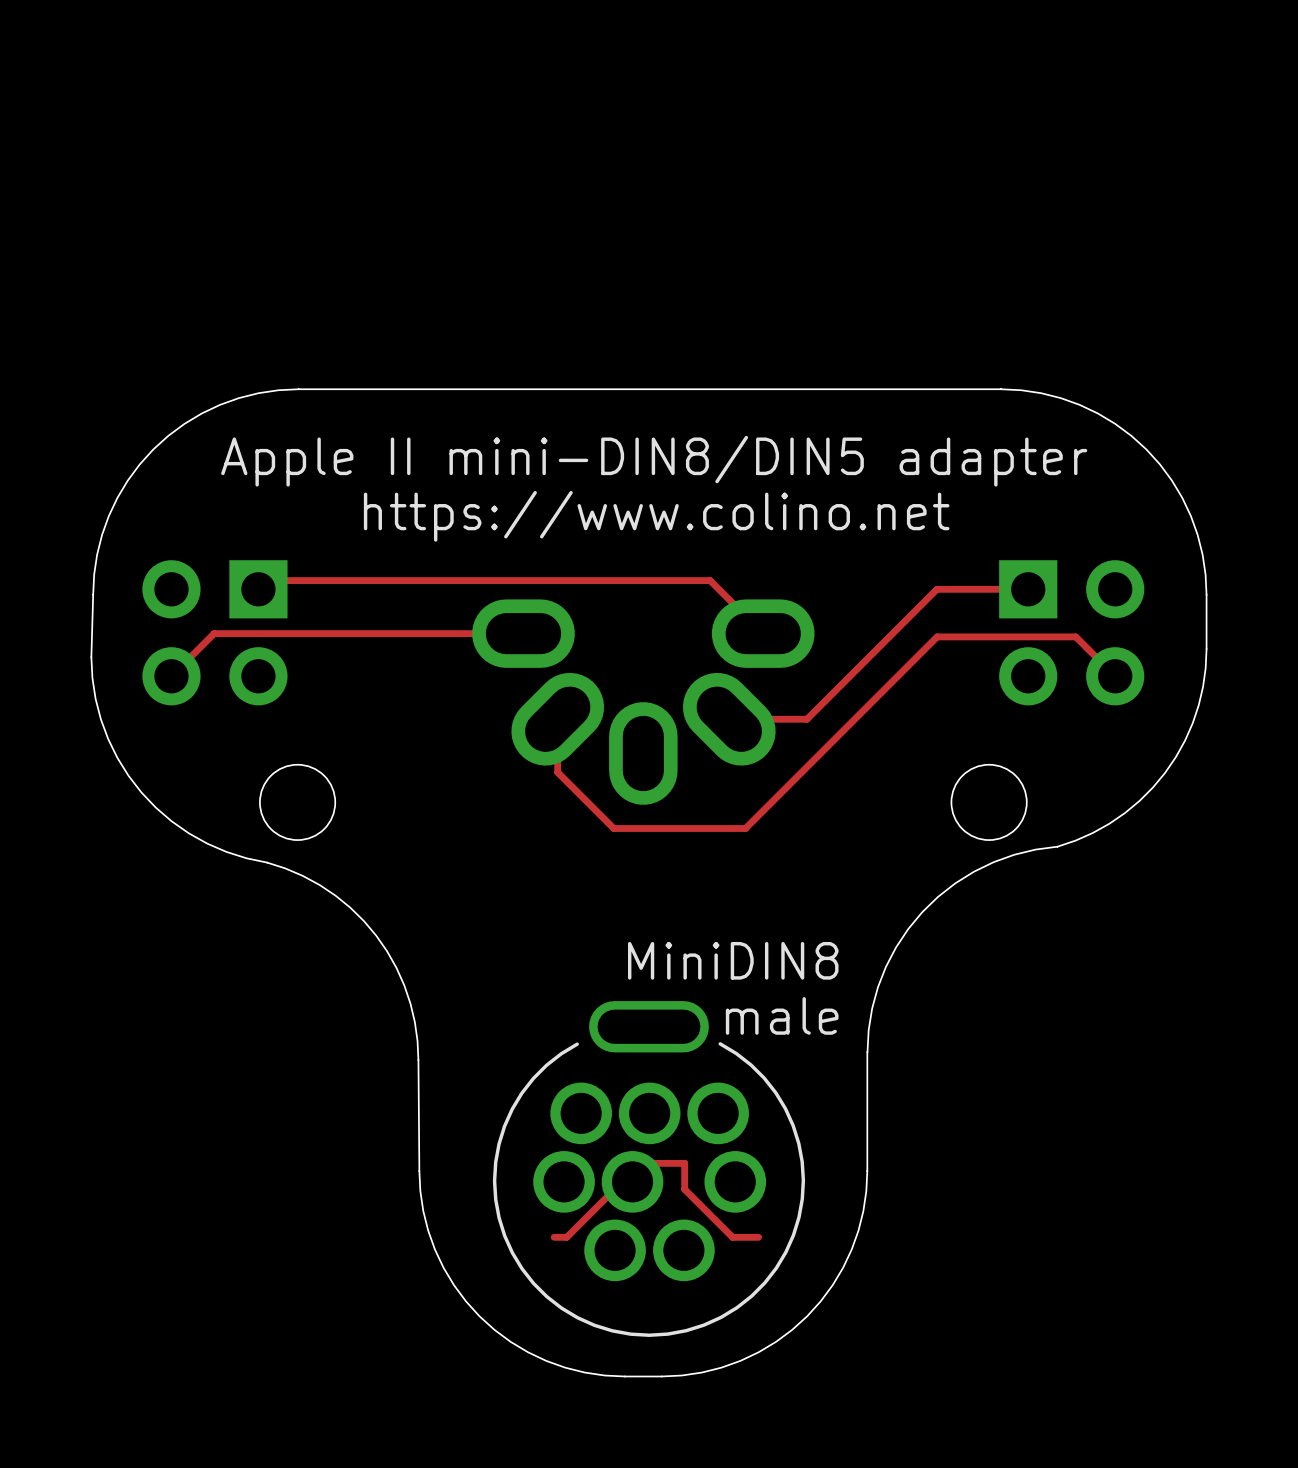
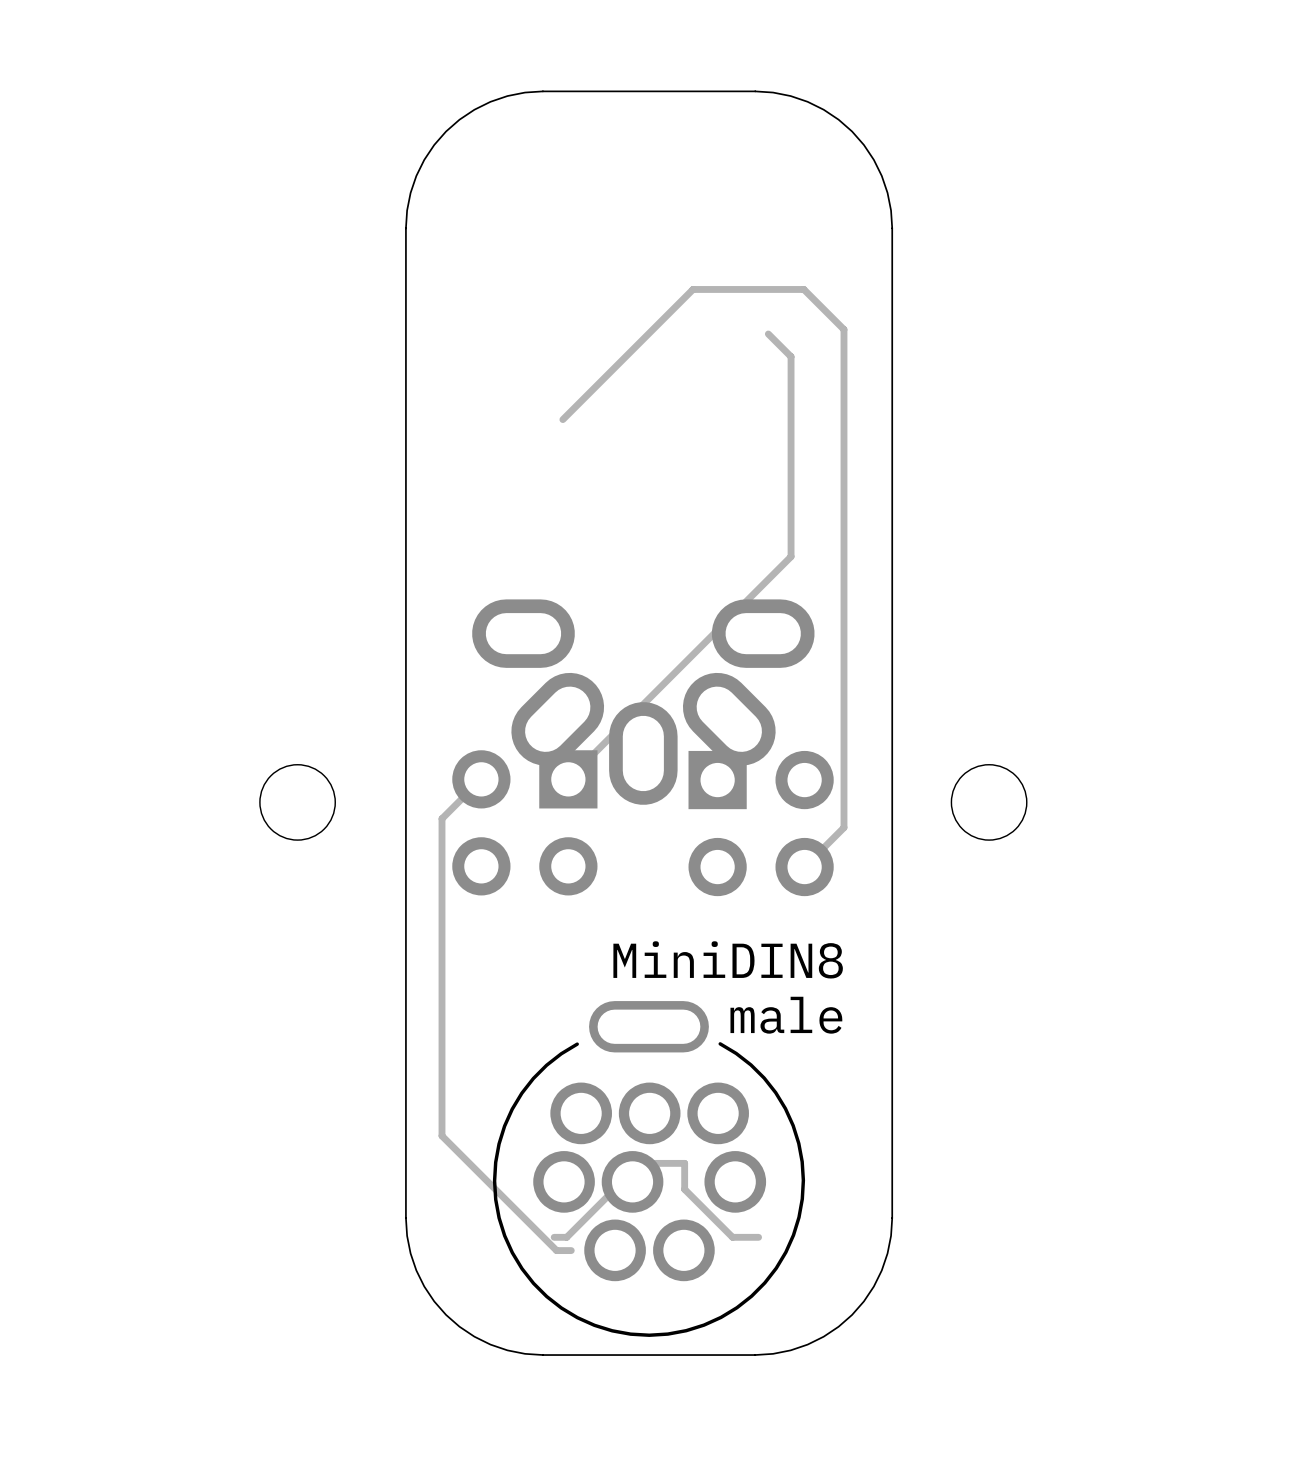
board edge: none -> (542, 91) (755, 91) (790, 96) (807, 101) (838, 119) (863, 144) (881, 175) (891, 210) (891, 1235) (881, 1270) (863, 1301) (852, 1314) (823, 1336) (790, 1350) (773, 1353) (542, 1355) (507, 1350) (474, 1336) (446, 1314) (434, 1301) (416, 1270) (407, 1235) (407, 210) (416, 175) (424, 159) (434, 144) (459, 119) (474, 109) (507, 96) (542, 91)
track: none -> (768, 333) (791, 356) (791, 556) (568, 779)
track: none -> (562, 419) (693, 289) (803, 289) (843, 329) (843, 827) (804, 867)
text: Apple II mini-DIN8/DIN5 adapter (654, 461) -> none
text: https://www.colino.net (656, 516) -> none
track: (258, 589) (267, 580) (710, 580) (763, 633) -> none
track: (1028, 589) (936, 589) (806, 719) (729, 719) -> none
part: (214, 632) -> none
part: (1071, 632) -> none
track: (523, 633) (214, 633) (171, 676) -> none
track: (1115, 676) (1075, 636) (937, 636) (745, 828) (613, 828) (557, 772) (557, 719) -> none
track: none -> (481, 779) (442, 818) (442, 1135) (556, 1250) (571, 1250)
part: none -> (524, 822)
part: none -> (761, 823)
board edge: (867, 1052) (866, 1191) (858, 1230) (851, 1249) (832, 1285) (820, 1301) (792, 1329) (758, 1352) (721, 1367) (681, 1375) (624, 1376) (584, 1372) (546, 1360) (527, 1352) (494, 1329) (466, 1301) (453, 1285) (435, 1249) (428, 1230) (420, 1191) (418, 1060) (414, 1022) (404, 985) (387, 951) (376, 935) (350, 907) (319, 885) (285, 868) (226, 851) (188, 833) (171, 821) (141, 792) (117, 757) (108, 738) (95, 698) (92, 678) (94, 574) (97, 554) (108, 516) (117, 497) (139, 464) (168, 435) (201, 413) (239, 398) (258, 393) (298, 389) (1021, 390) (1060, 398) (1079, 404) (1097, 413) (1131, 435) (1159, 464) (1182, 497) (1197, 535) (1202, 554) (1206, 594) (1205, 668) (1203, 686) (1192, 723) (1175, 757) (1165, 772) (1139, 800) (1125, 813) (1109, 823) (1075, 840) (1057, 846) (1014, 854) (973, 871) (938, 896) (922, 912) (896, 947) (877, 987) (868, 1030) (867, 1052) -> none

